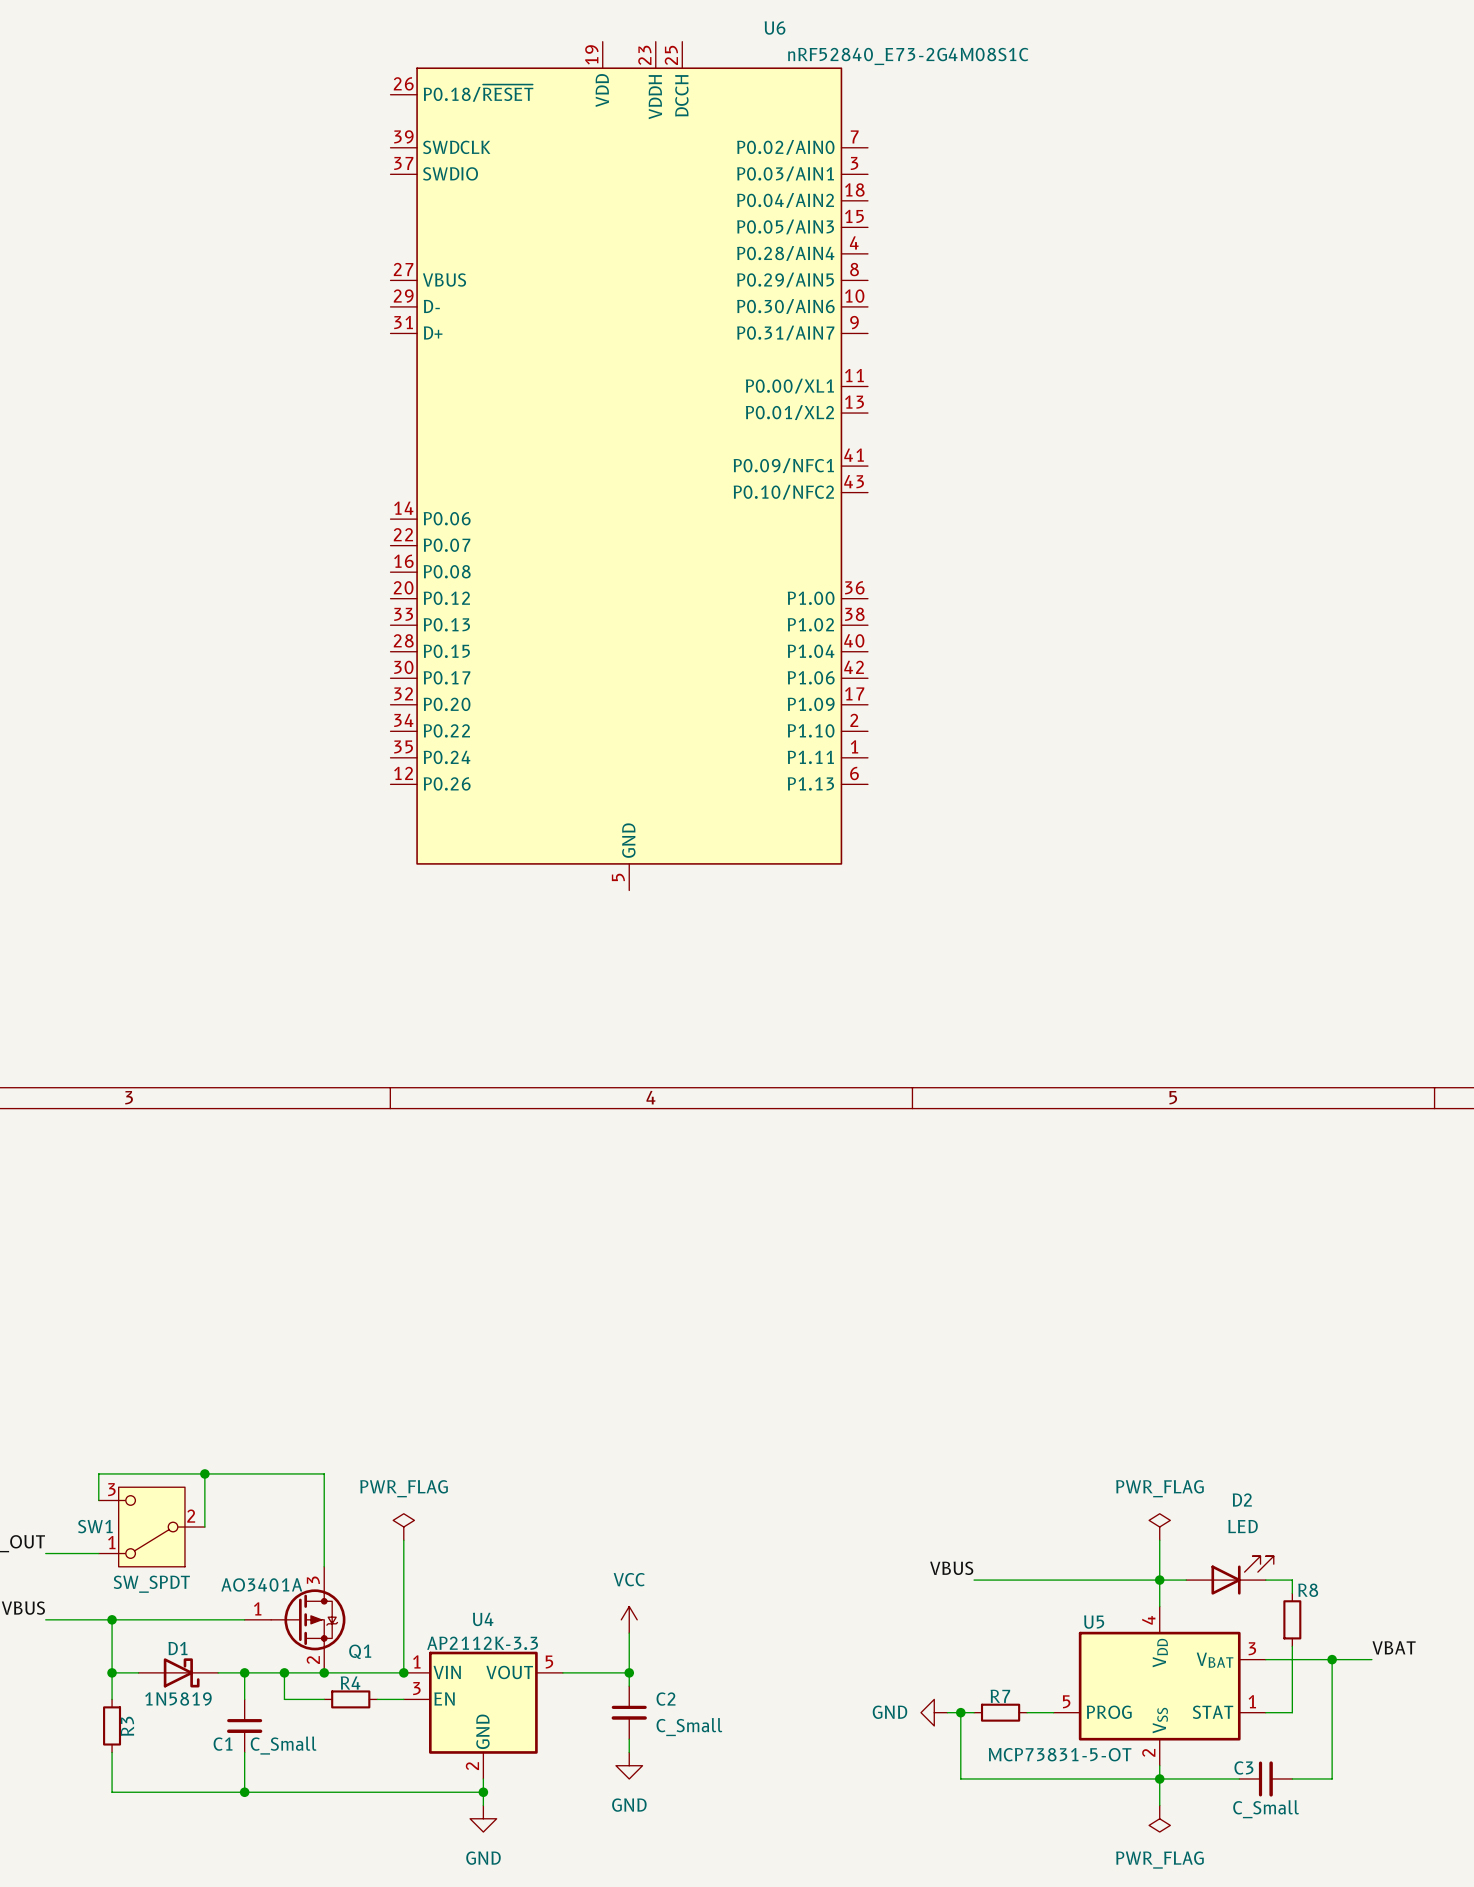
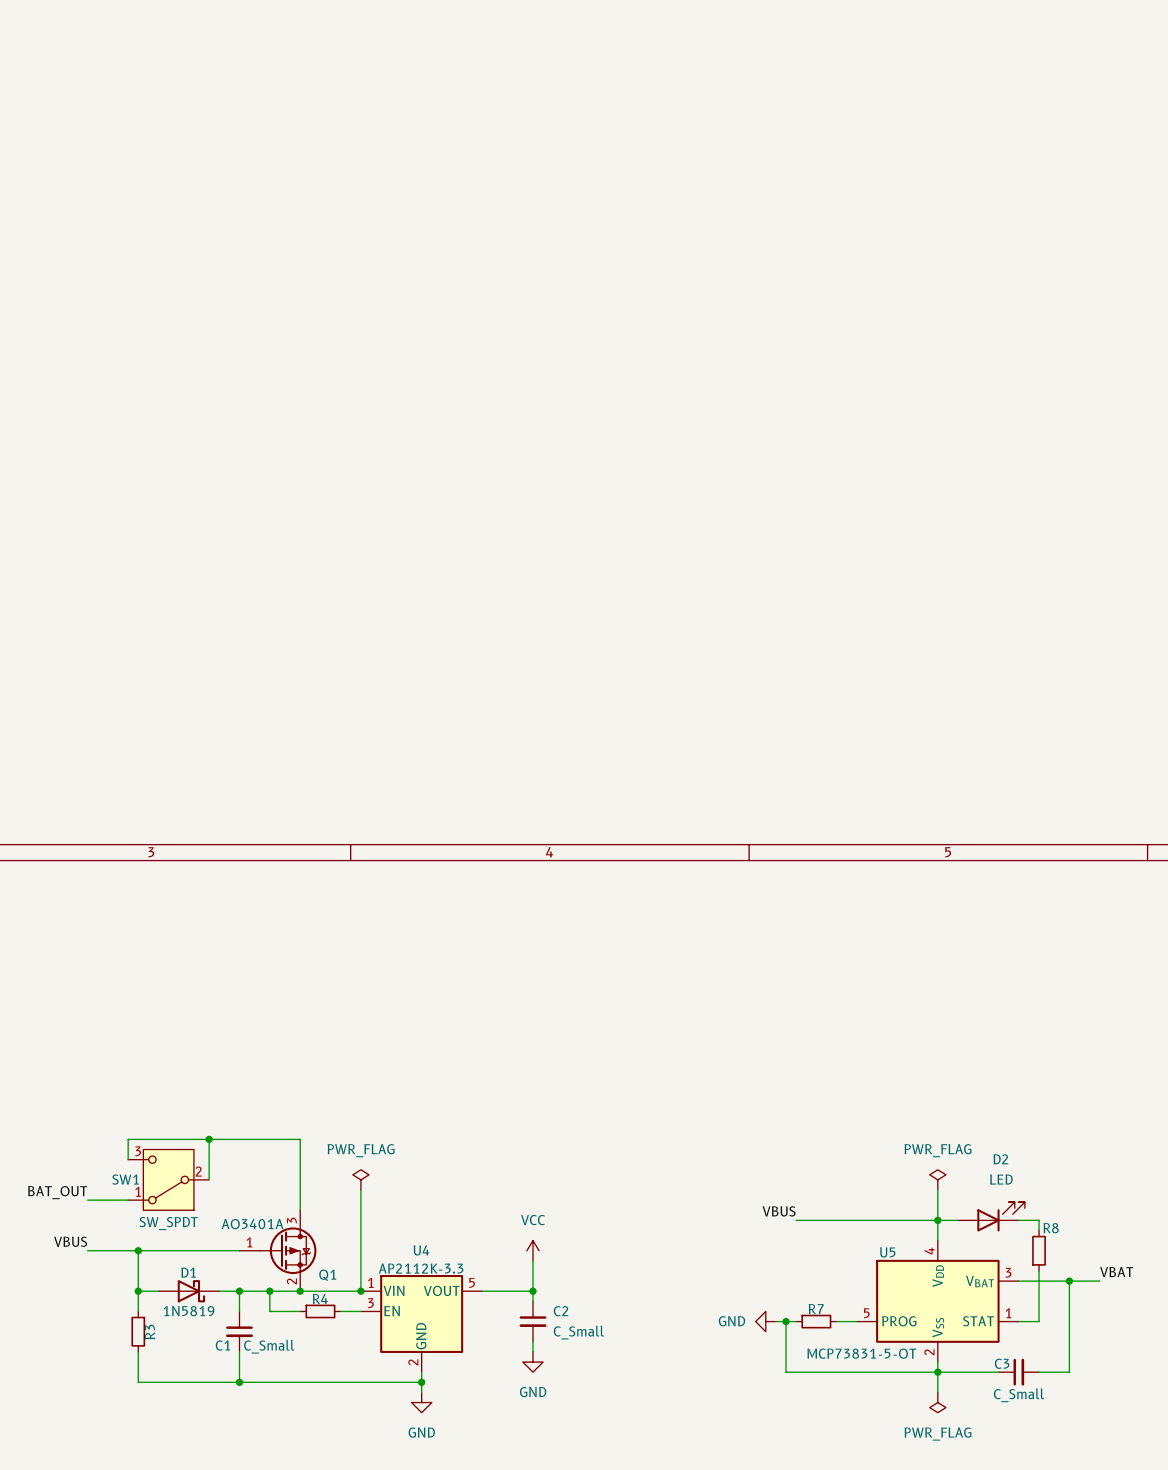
U6: nRF52840_E73-2G4M08S1C (629, 466) -> none

